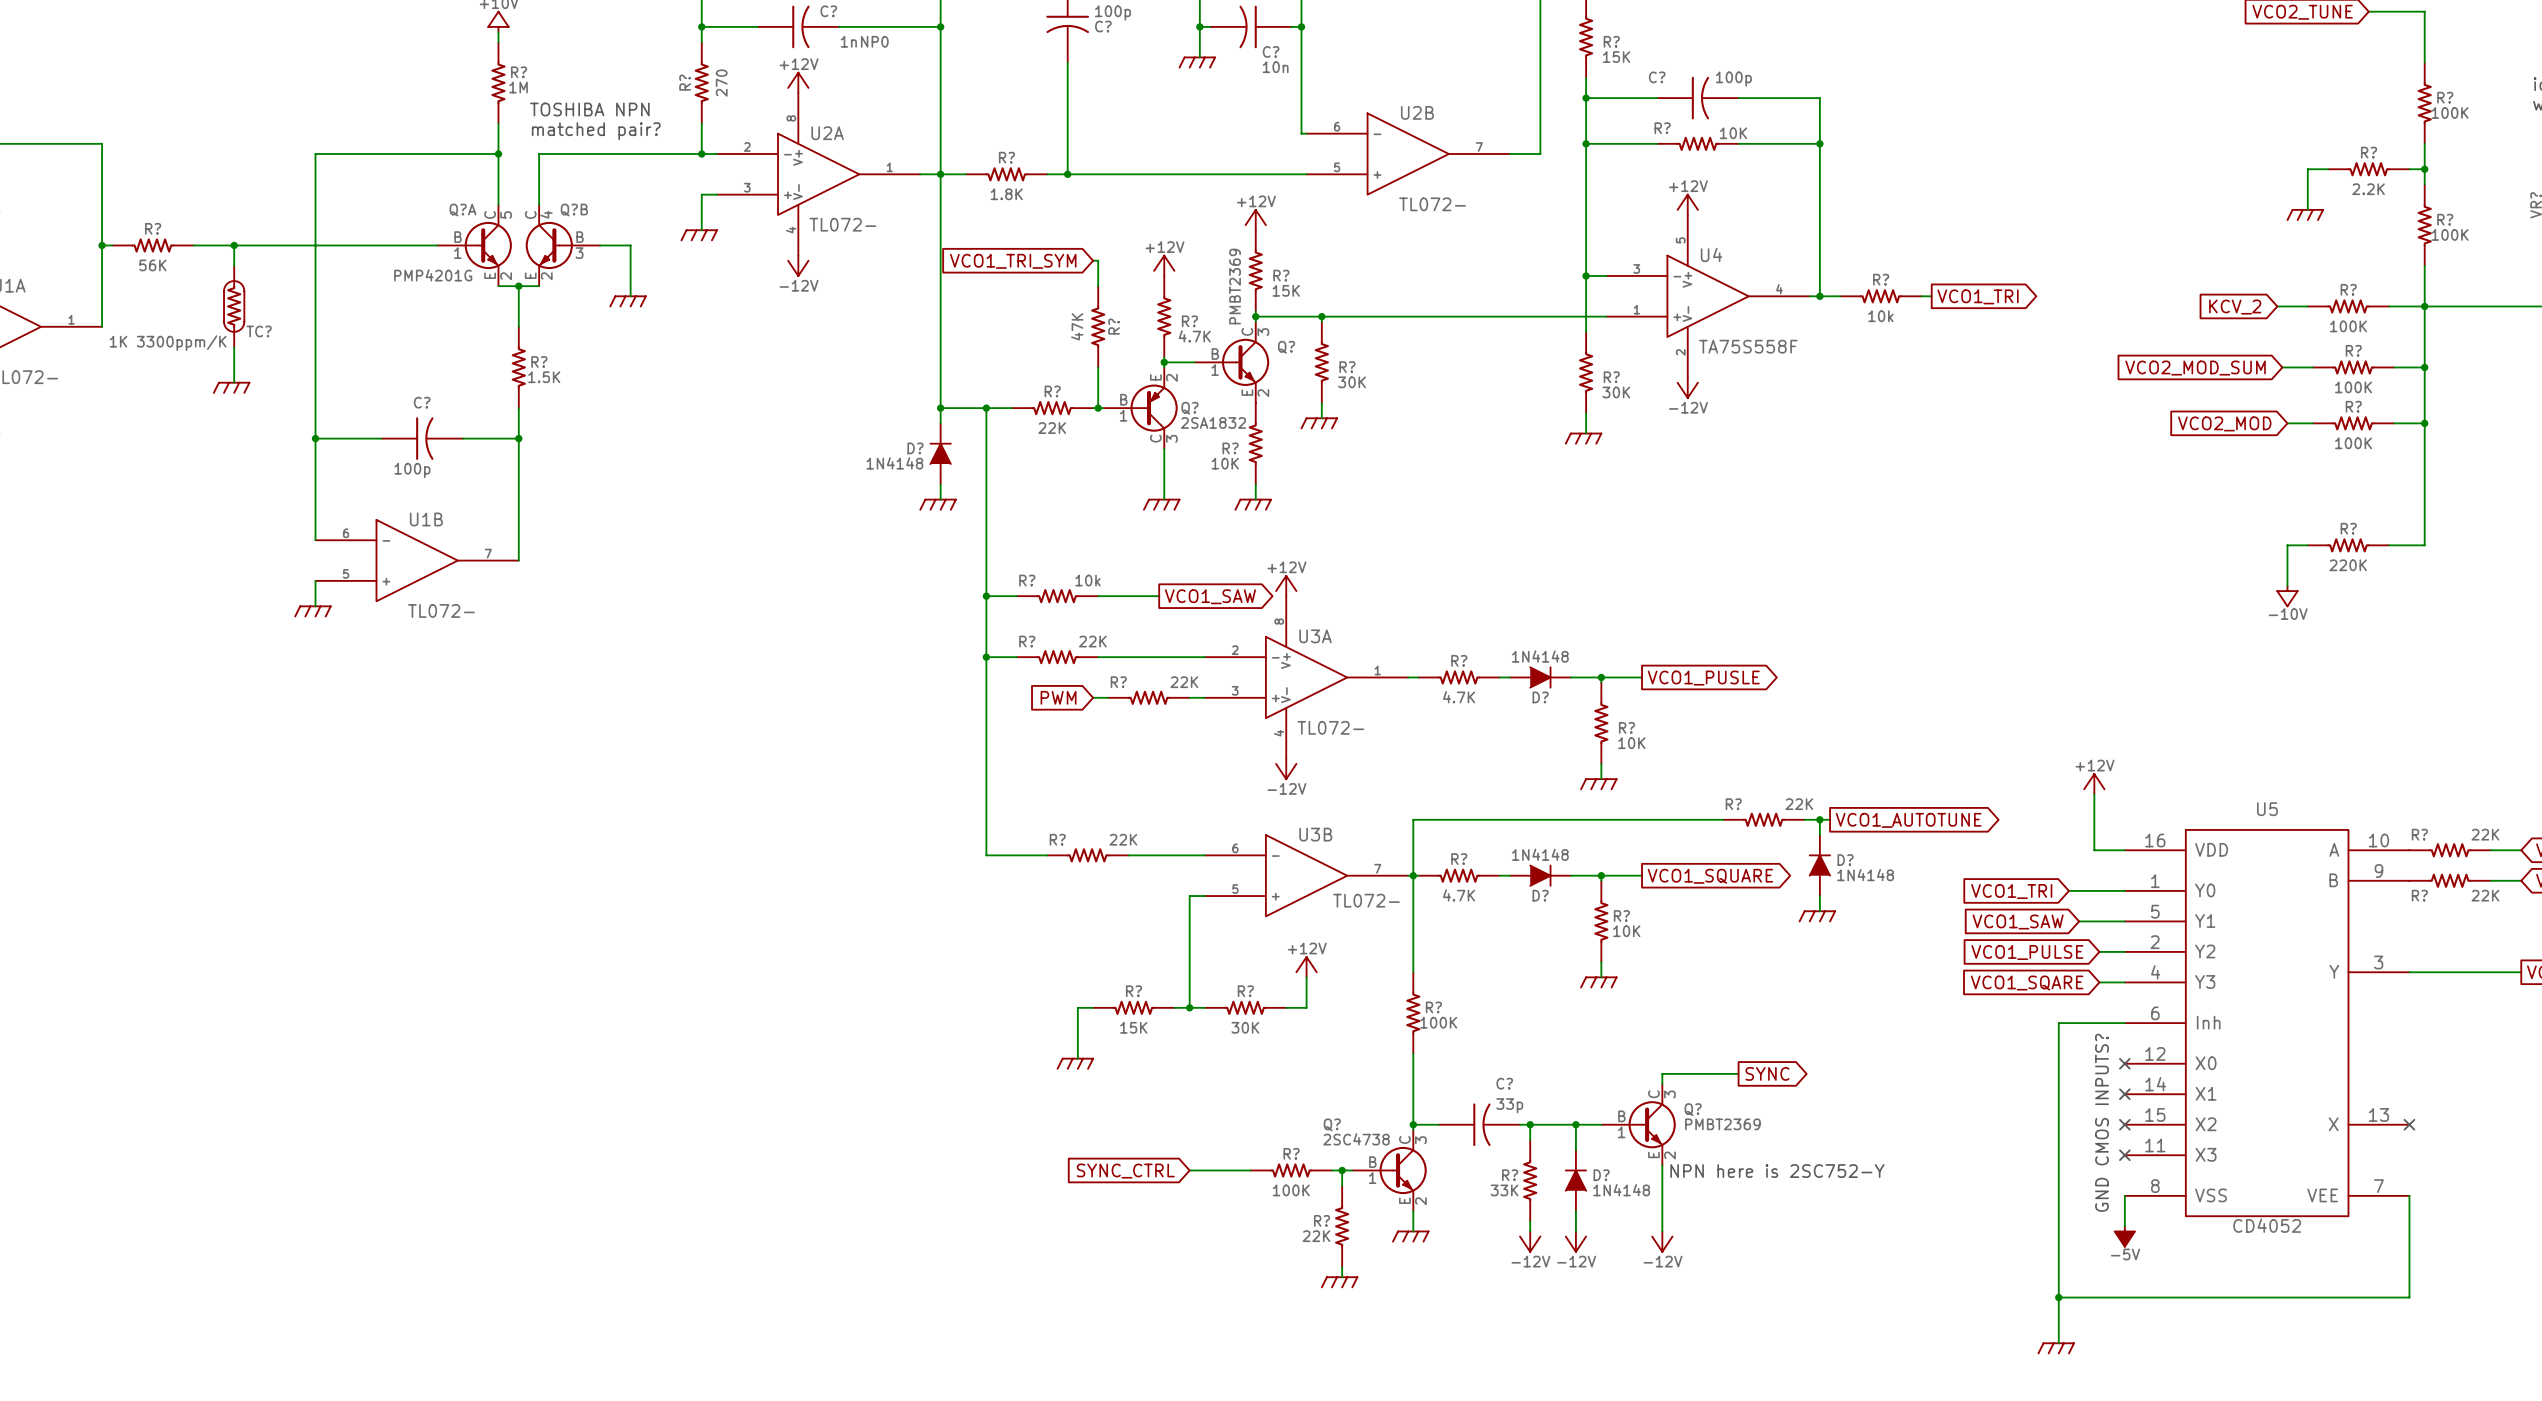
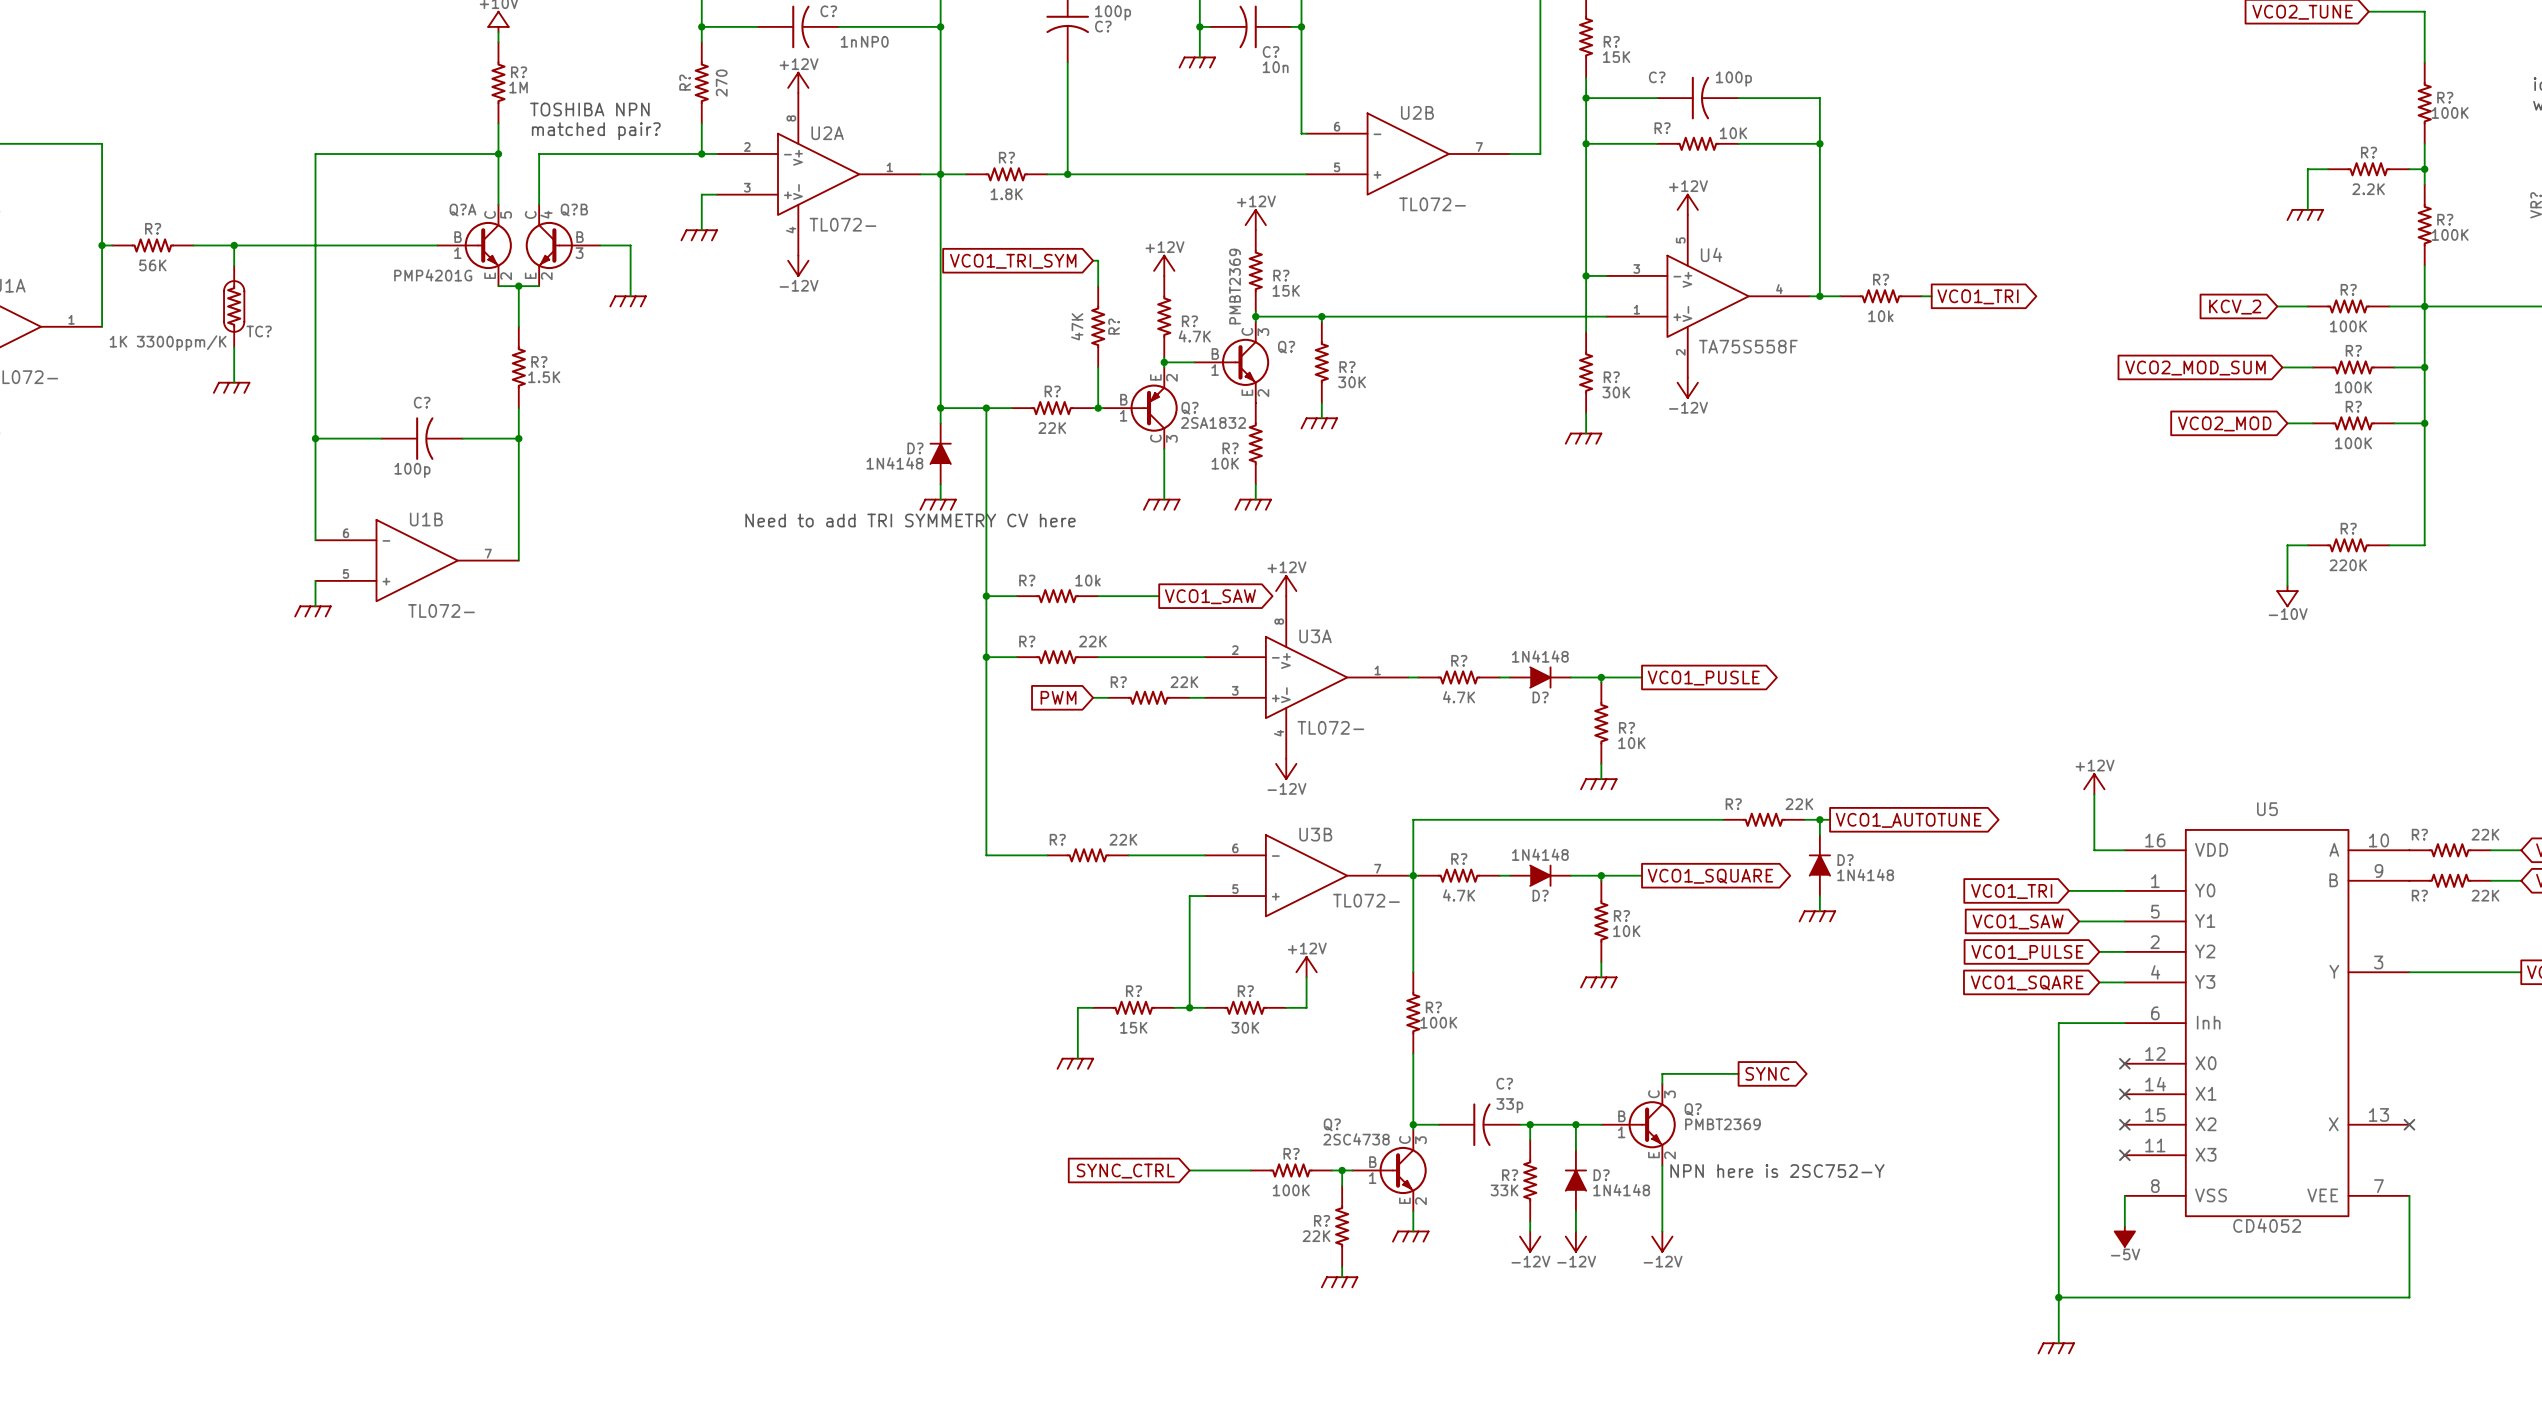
text: none -> Need to add TRI SYMMETRY CV here (910, 520)
text: GND CMOS INPUTS? (2102, 1122) -> none

